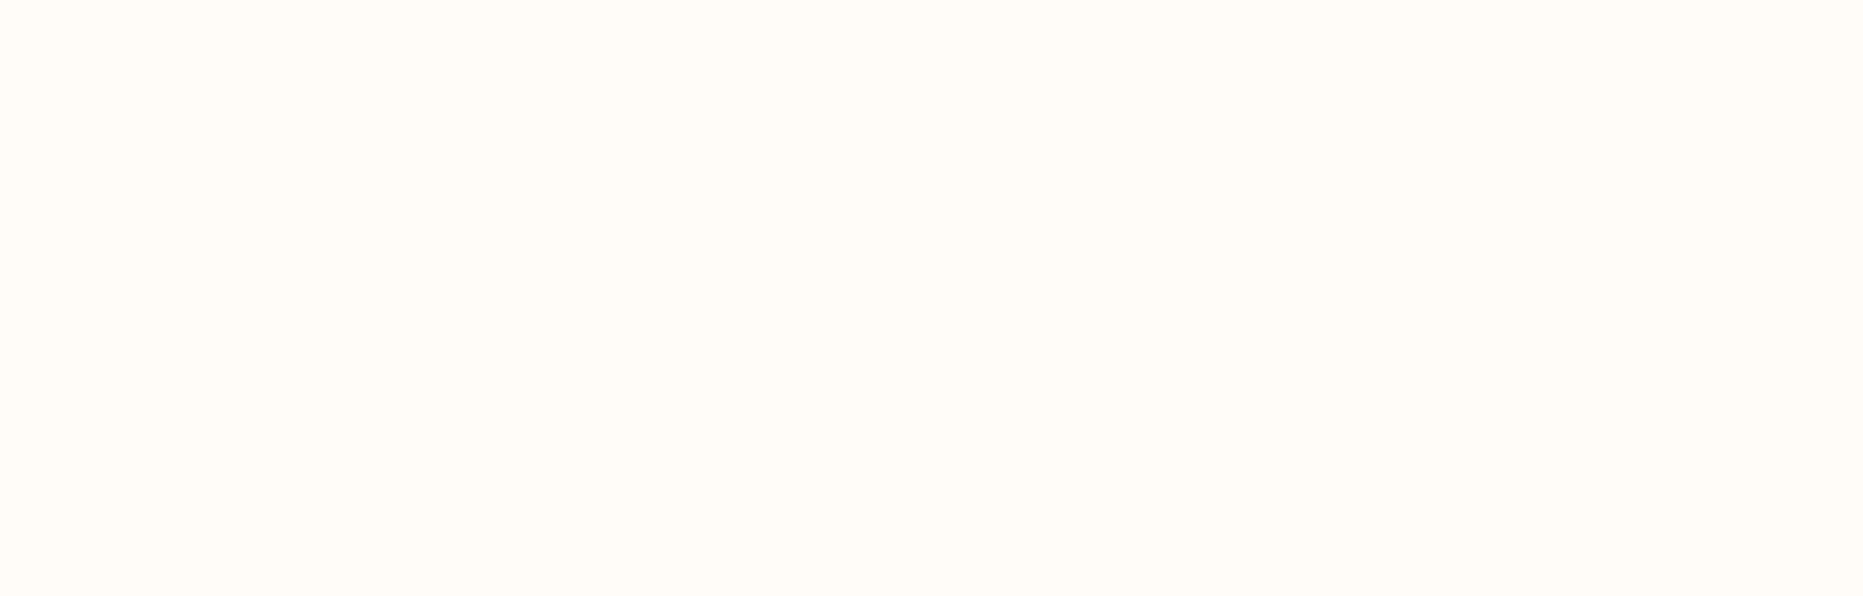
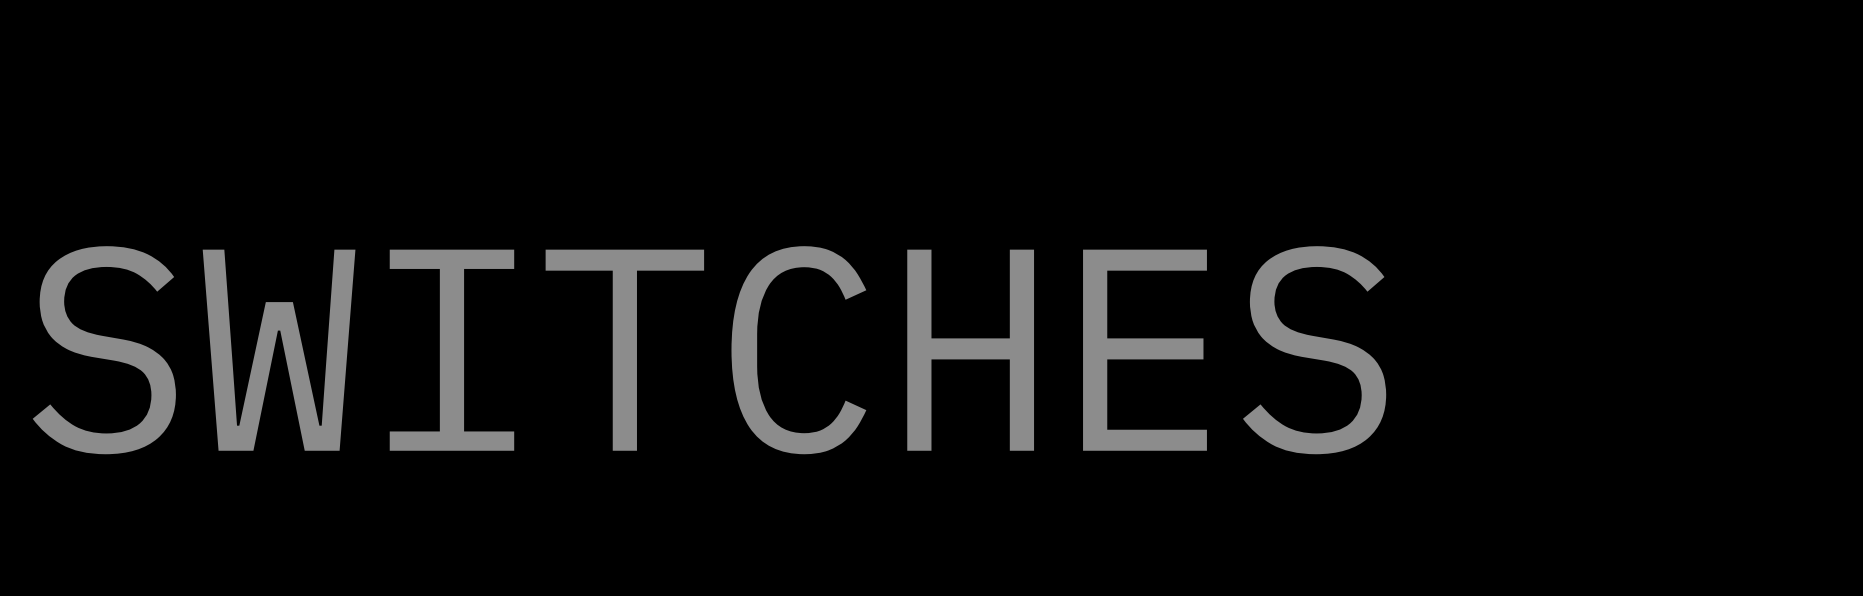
text: none -> SWITCHES (709, 350)

